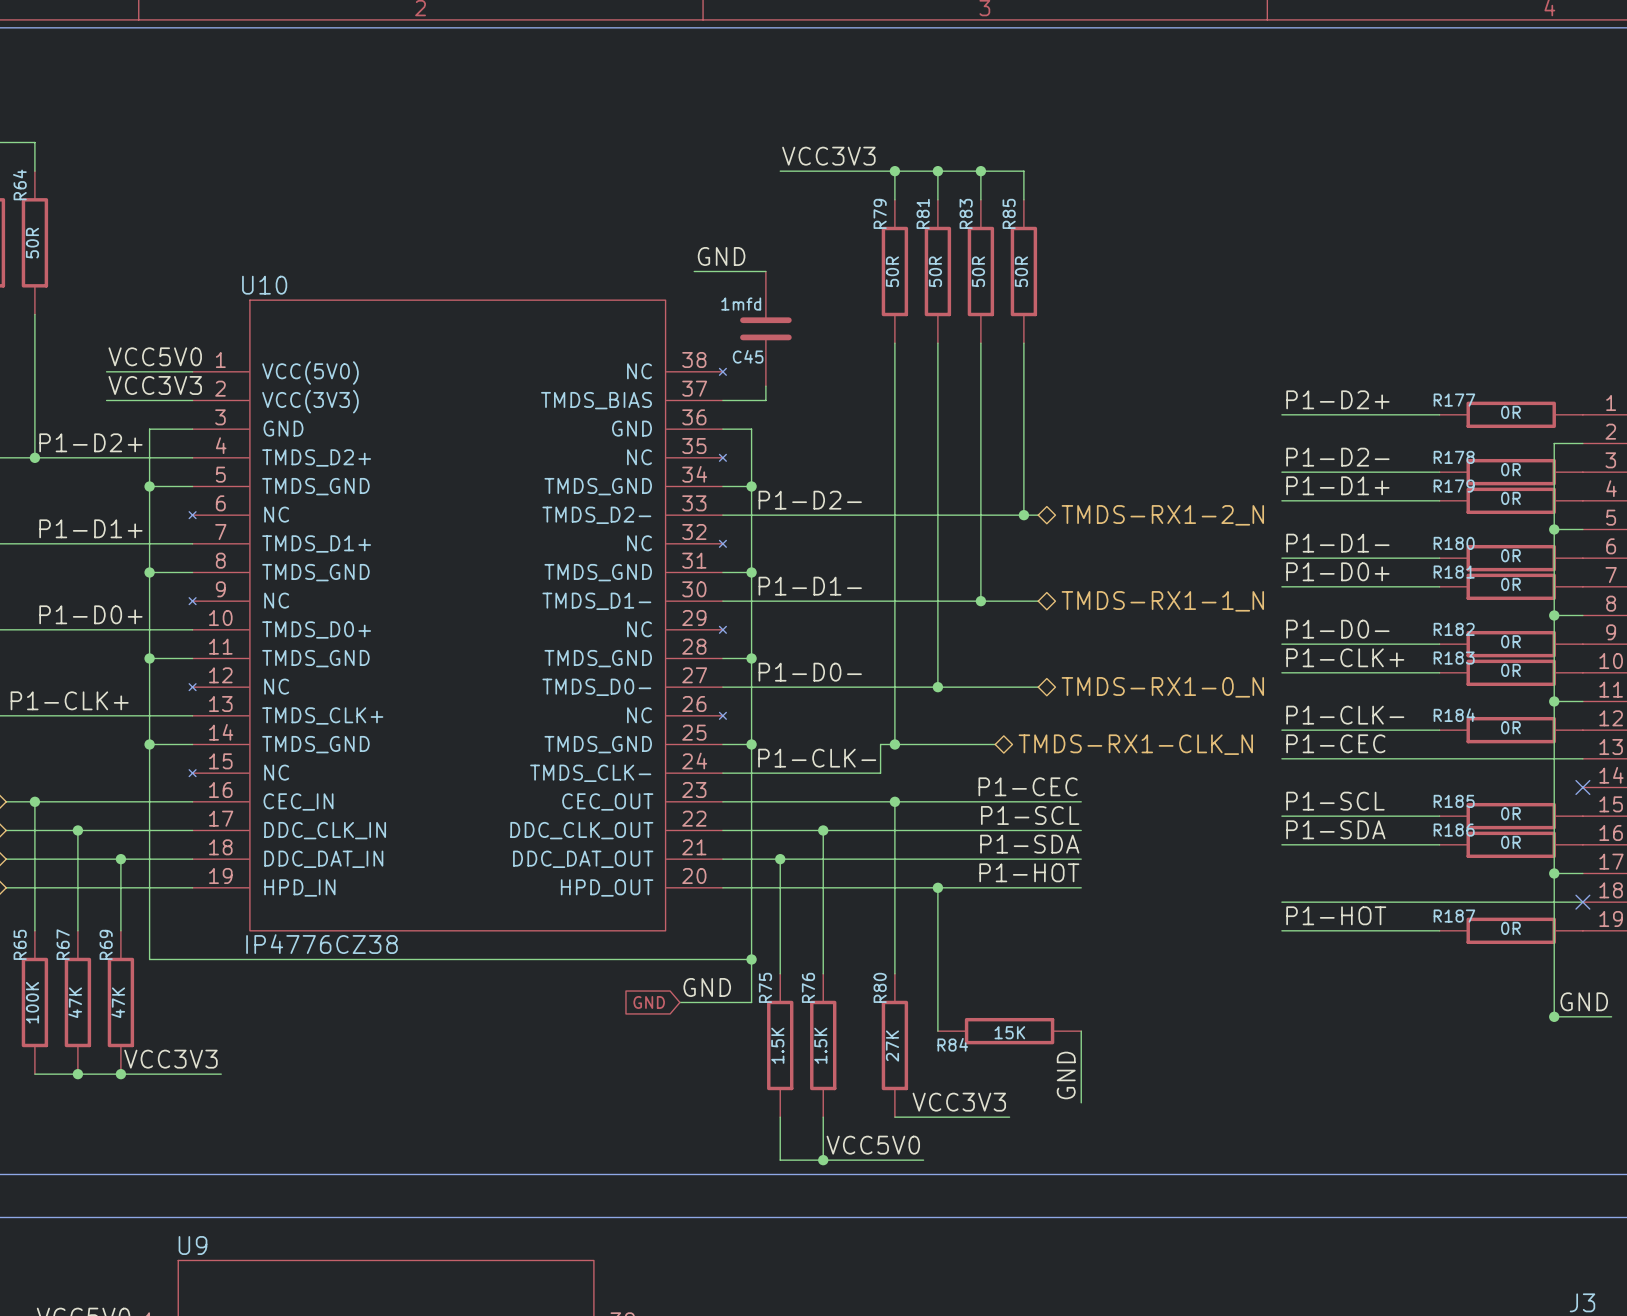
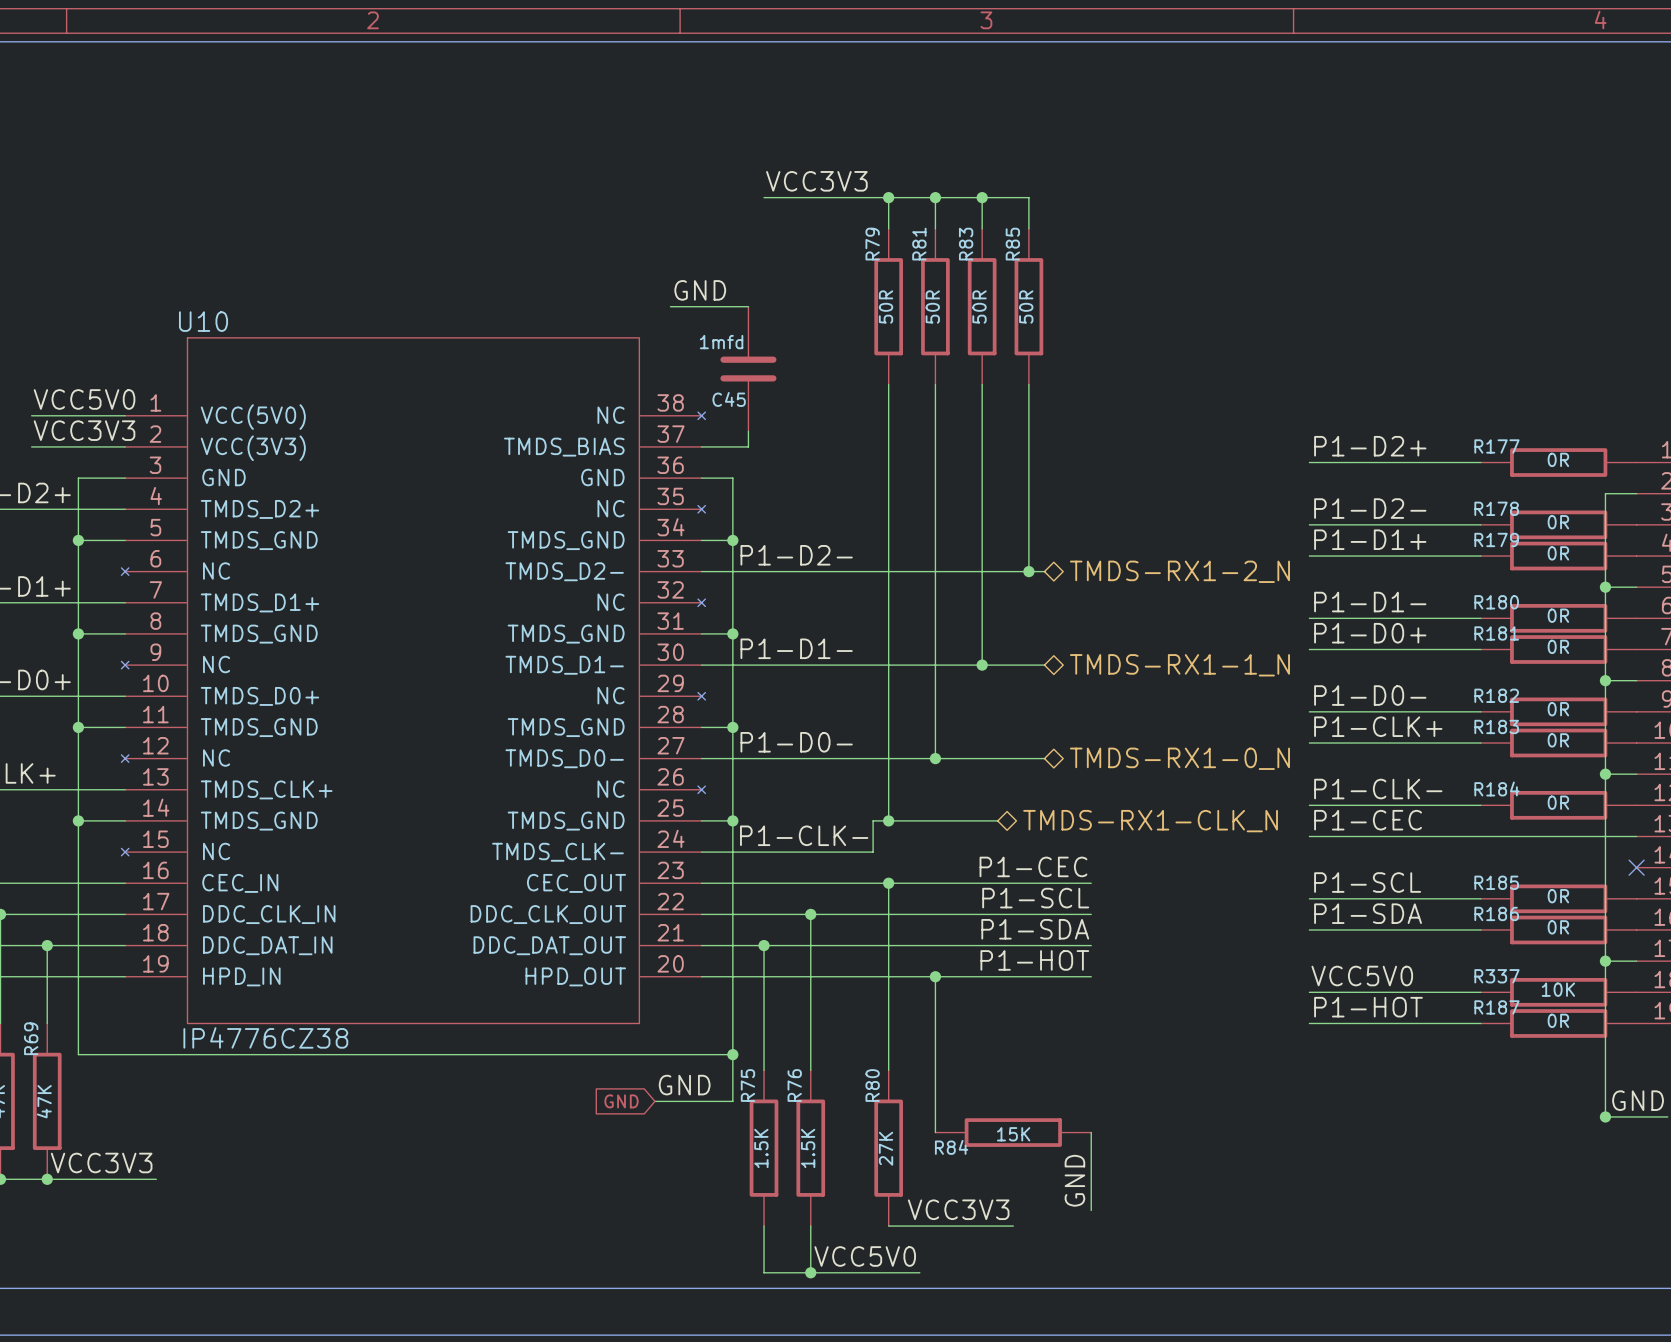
label: none -> VCC5V0 (1362, 976)
wire: (1439, 902) (1582, 902) -> none
R337: none -> 10K (1558, 992)
no-connect mark: (1582, 902) -> none

